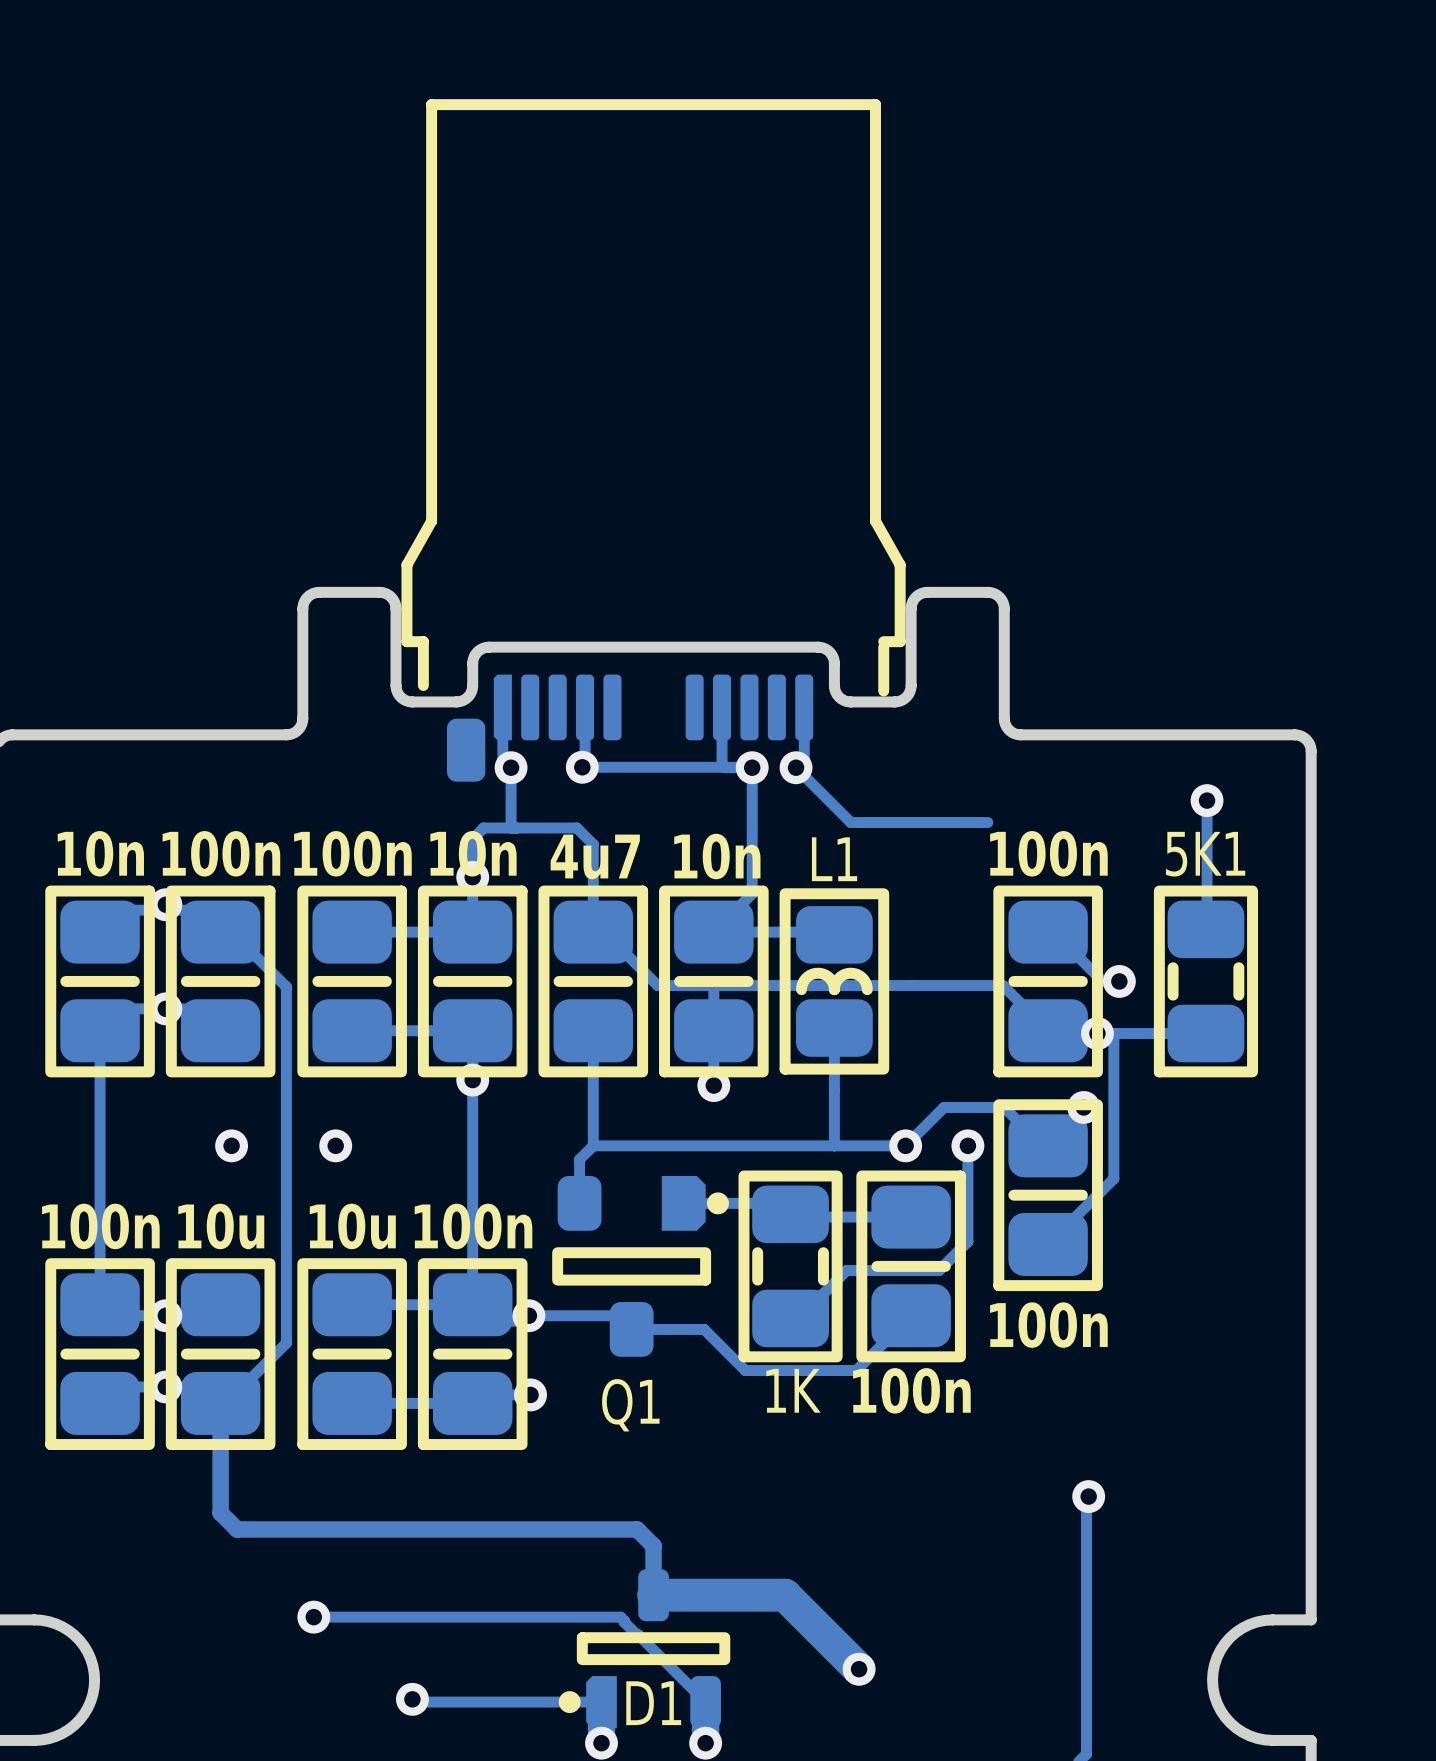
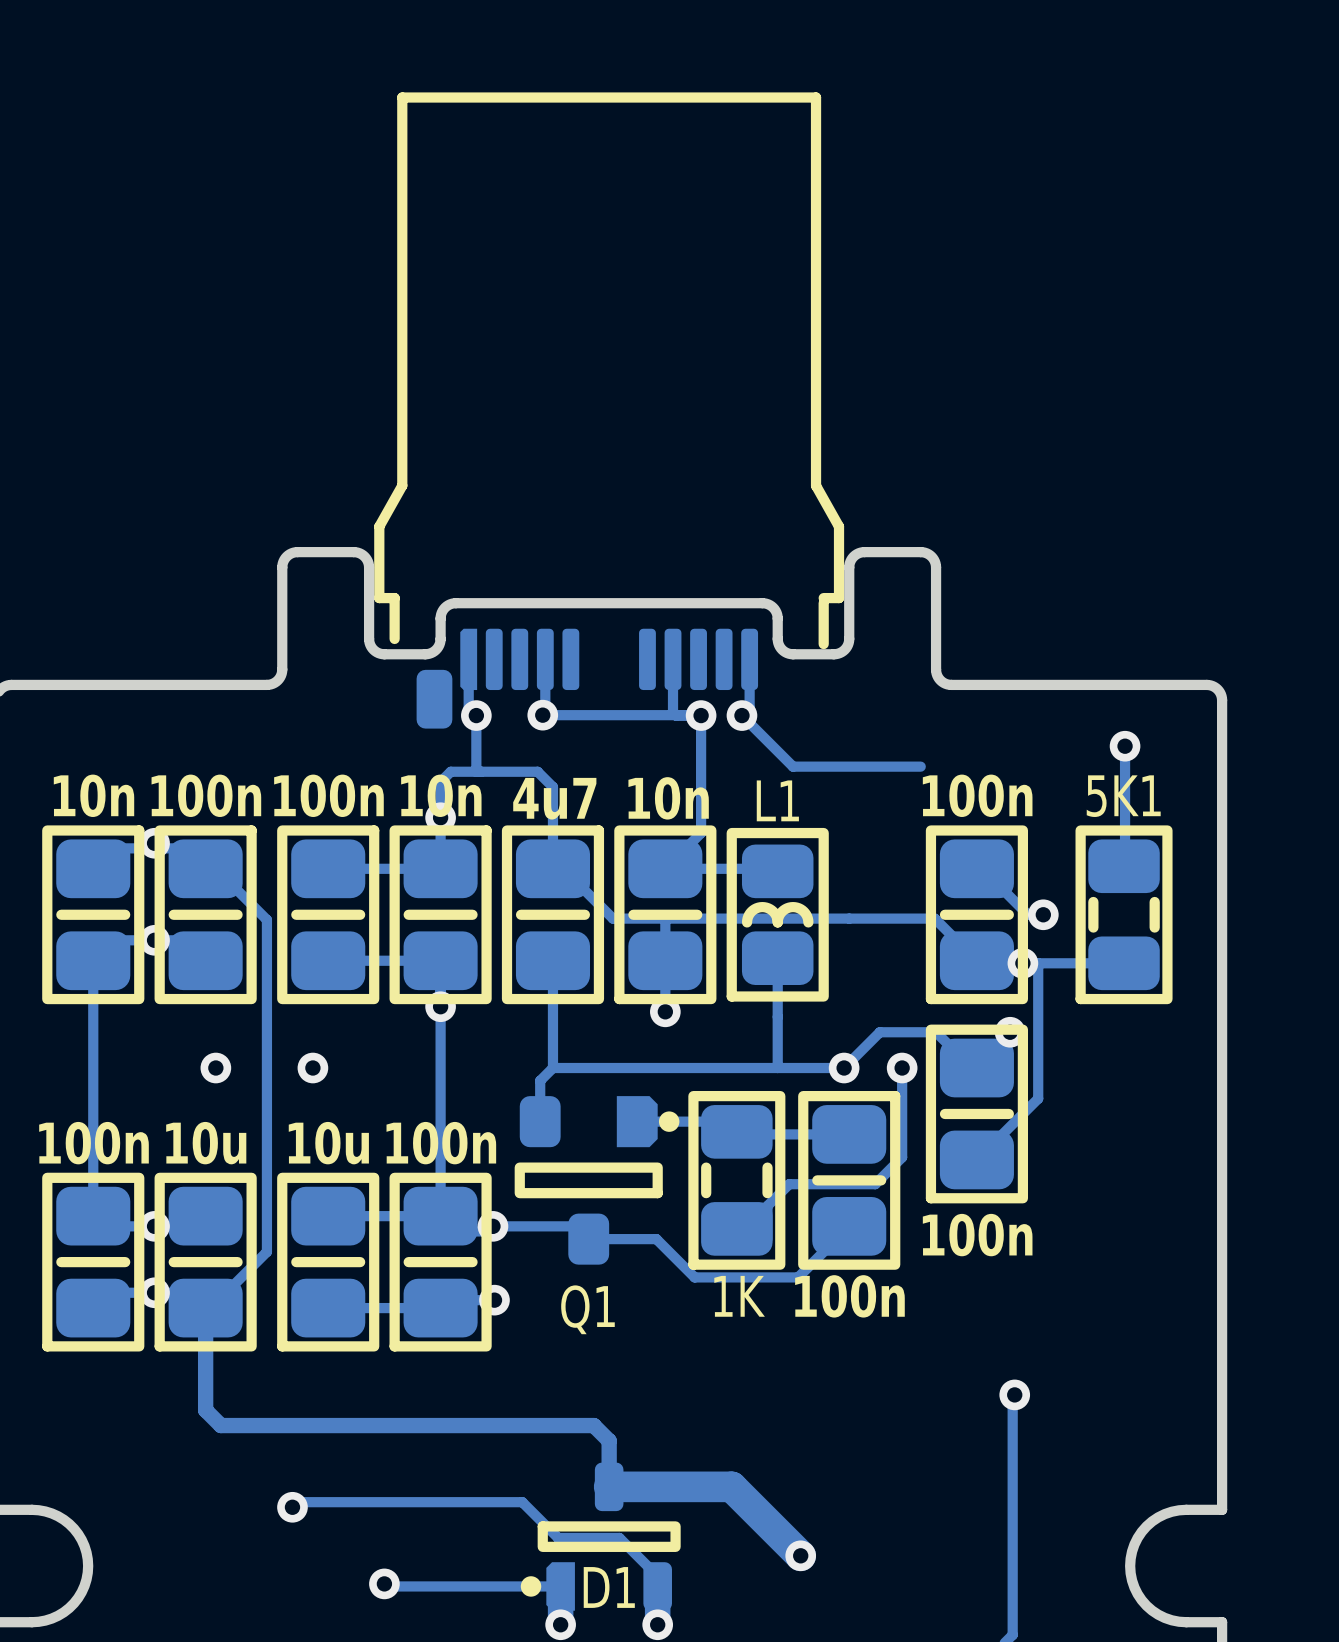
track: (313, 1617) (620, 1617) (705, 1702) -> (292, 1502) (522, 1502) (558, 1537) (619, 1537) (657, 1576) (657, 1586)

